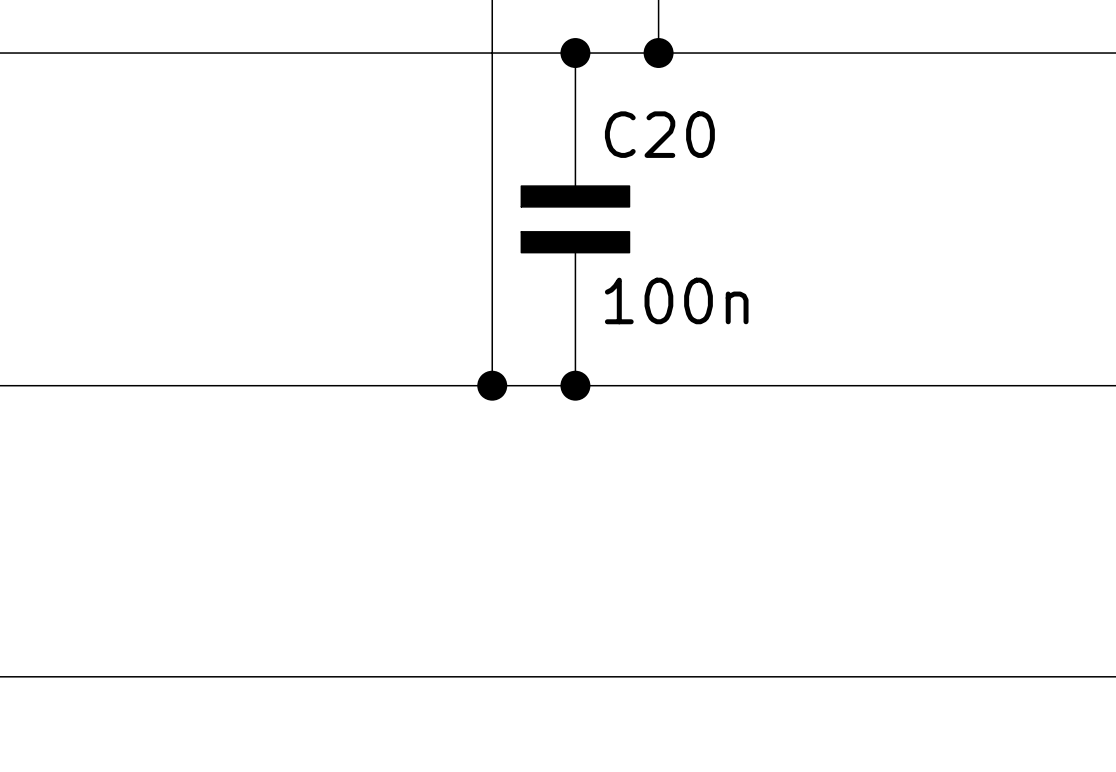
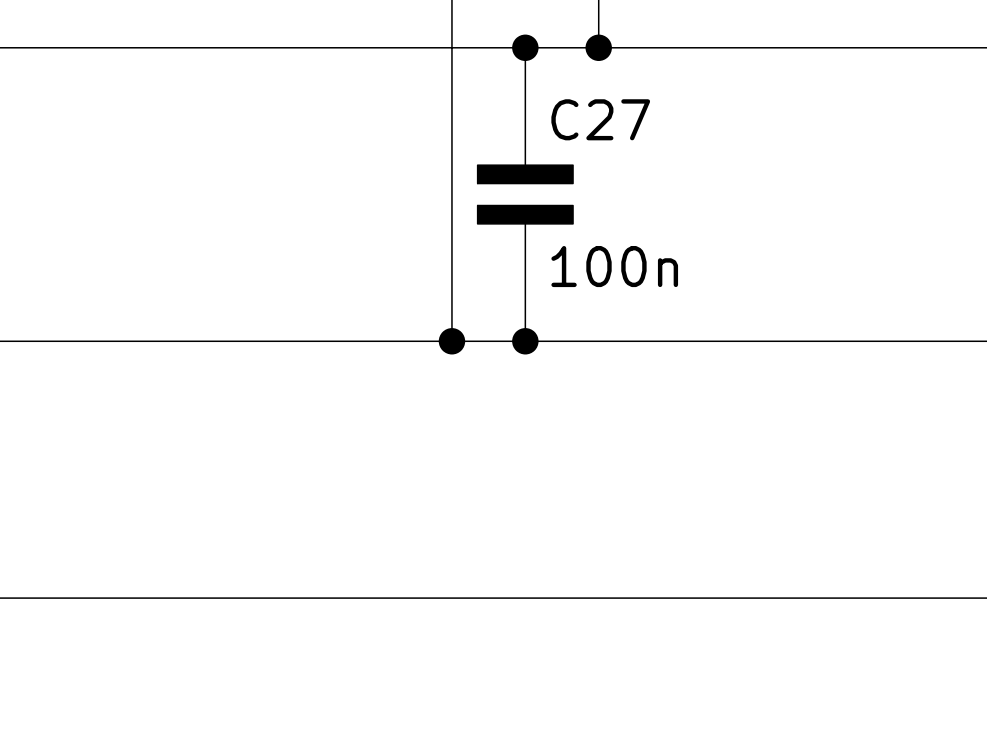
C20 name: C20 (659, 134) -> C27 (600, 119)

